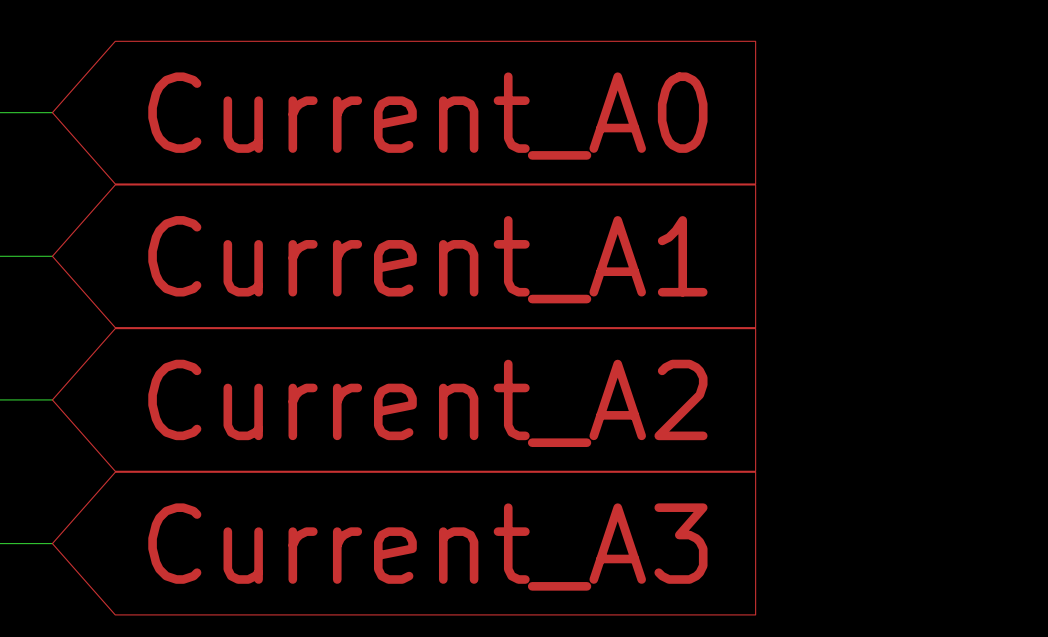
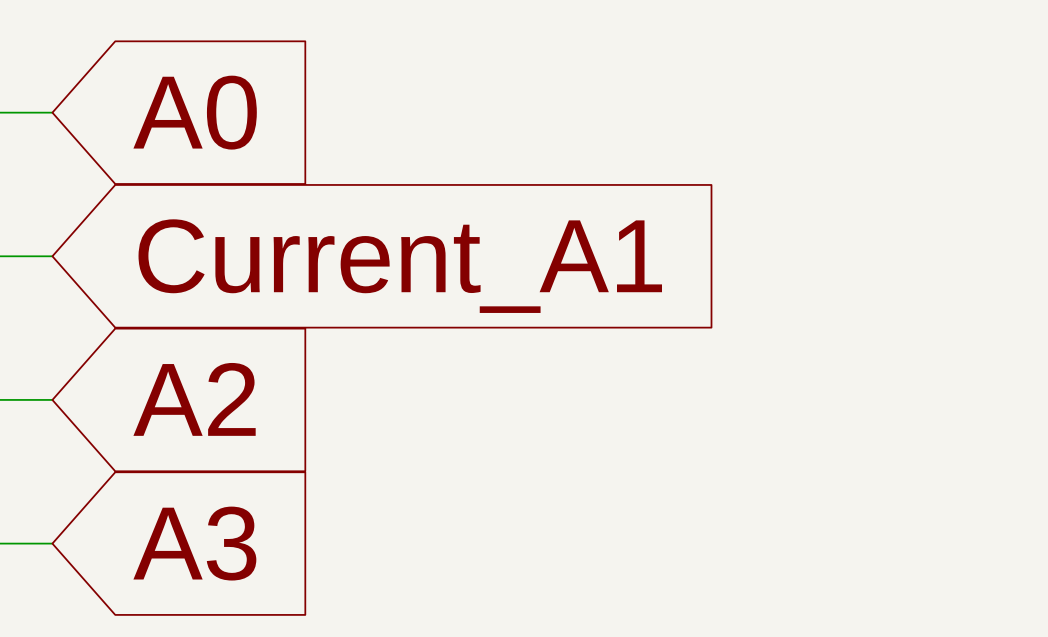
global label: Current_A0 (427, 116) -> A0 (195, 112)
global label: Current_A2 (427, 403) -> A2 (194, 399)
global label: Current_A3 (427, 547) -> A3 (194, 543)

